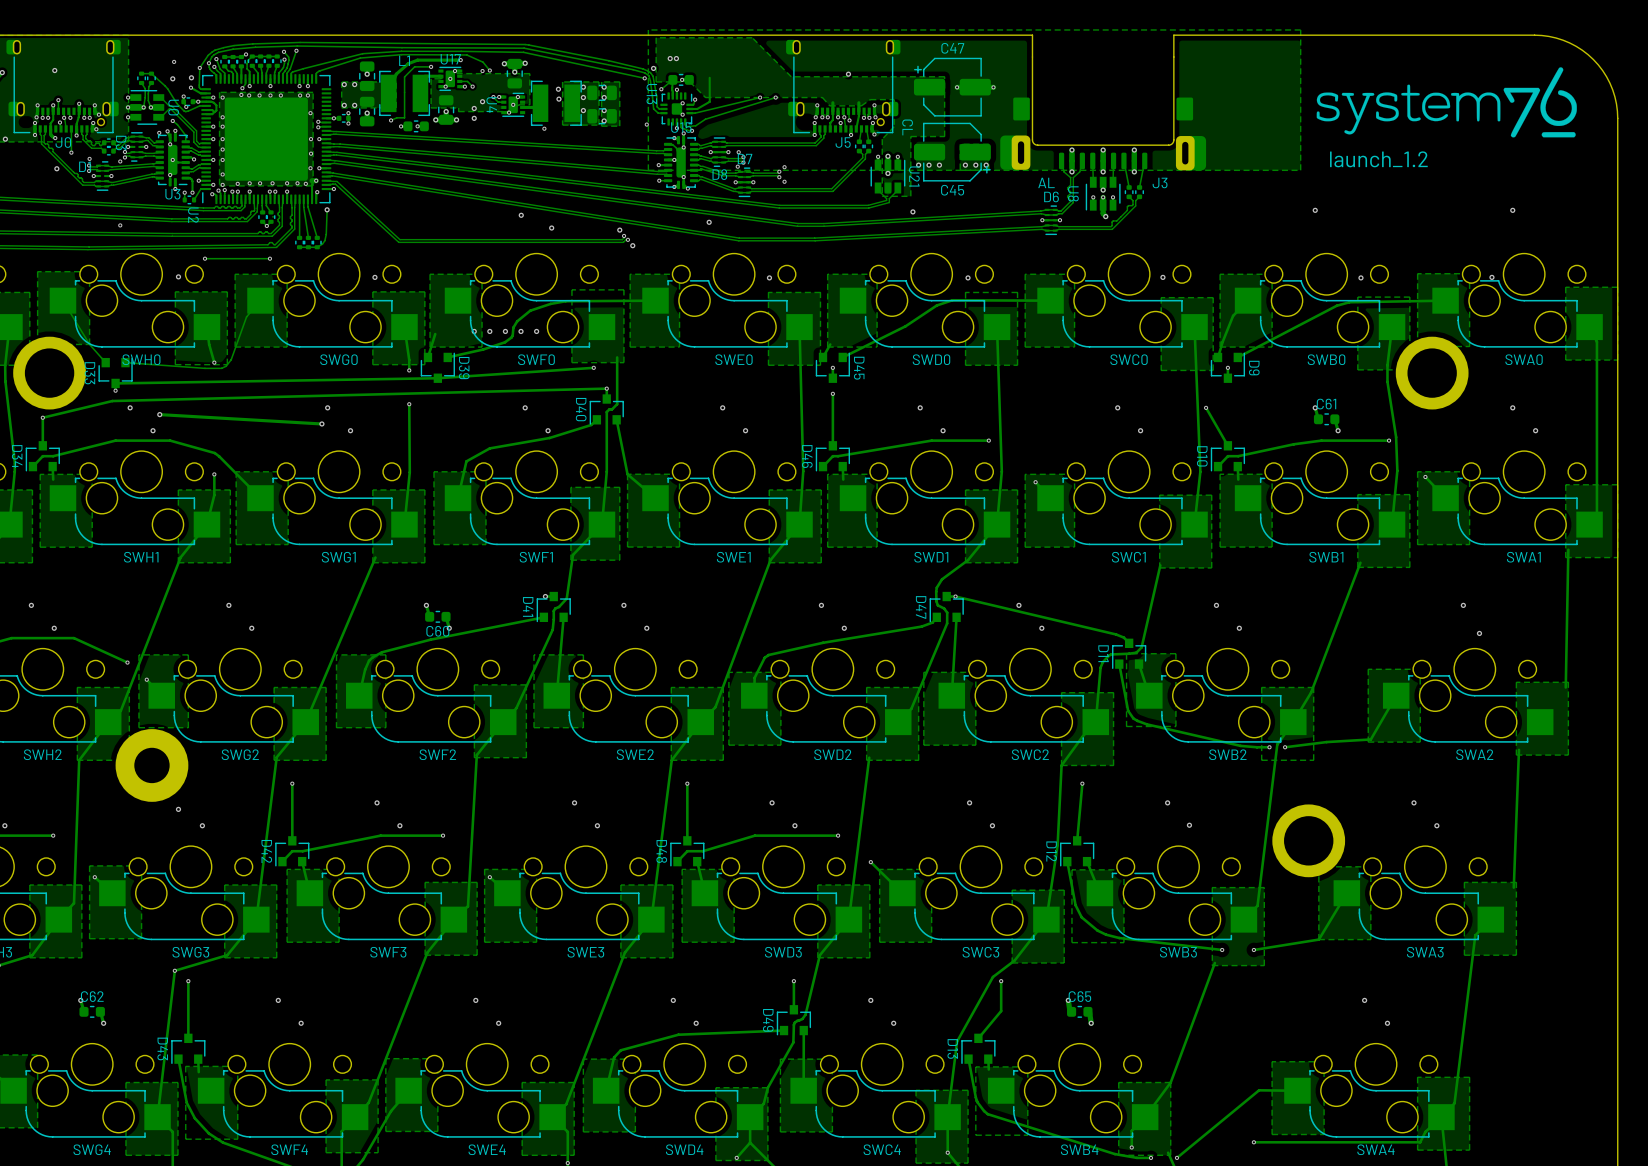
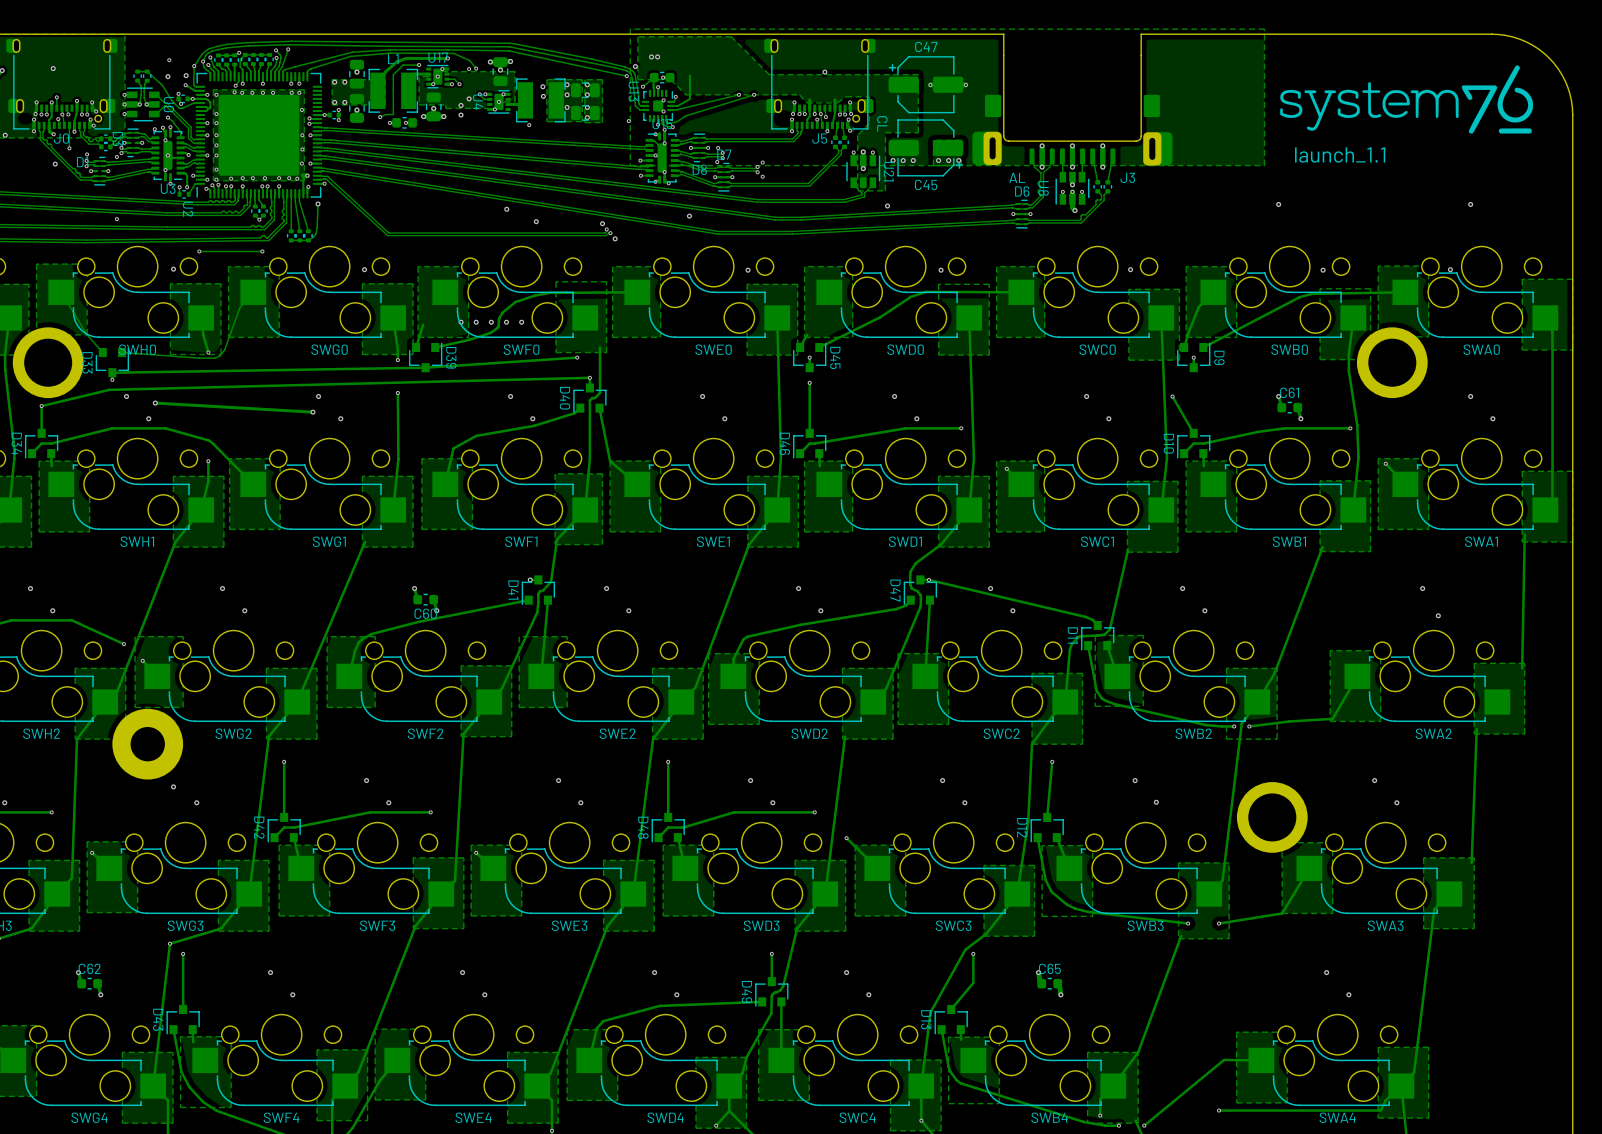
text: launch_1.2 (1378, 159) -> launch_1.1 (1340, 154)

